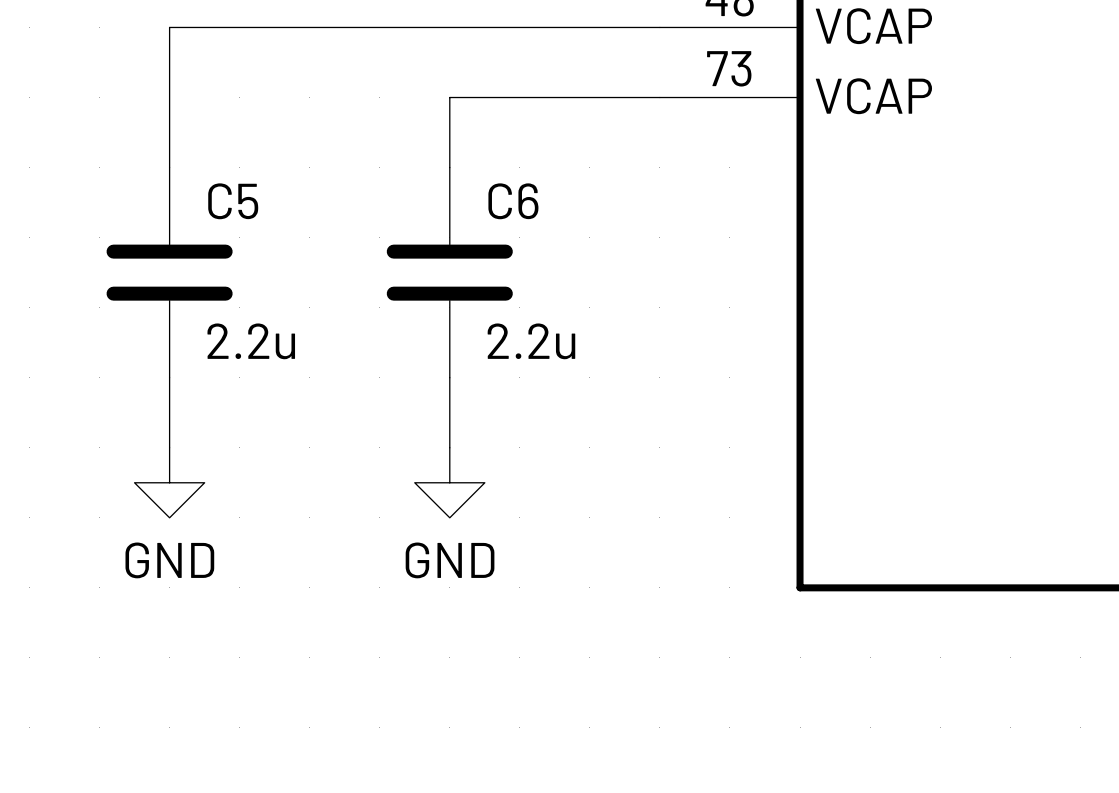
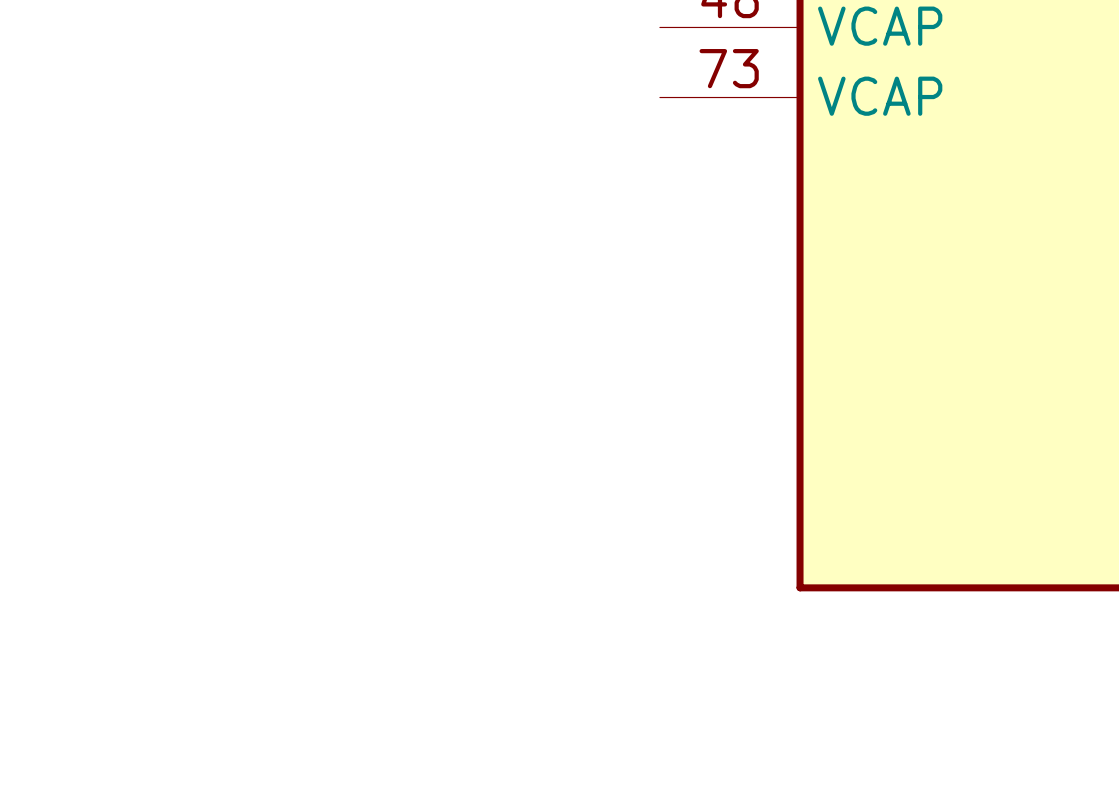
wire: (659, 27) (169, 27) (169, 167) -> none
wire: (659, 97) (449, 97) (449, 167) -> none
C5: 2.2u (169, 272) -> none
C6: 2.2u (449, 272) -> none
wire: (169, 377) (169, 447) -> none
wire: (449, 377) (449, 447) -> none
power symbol: GND (169, 482) -> none
power symbol: GND (449, 482) -> none

